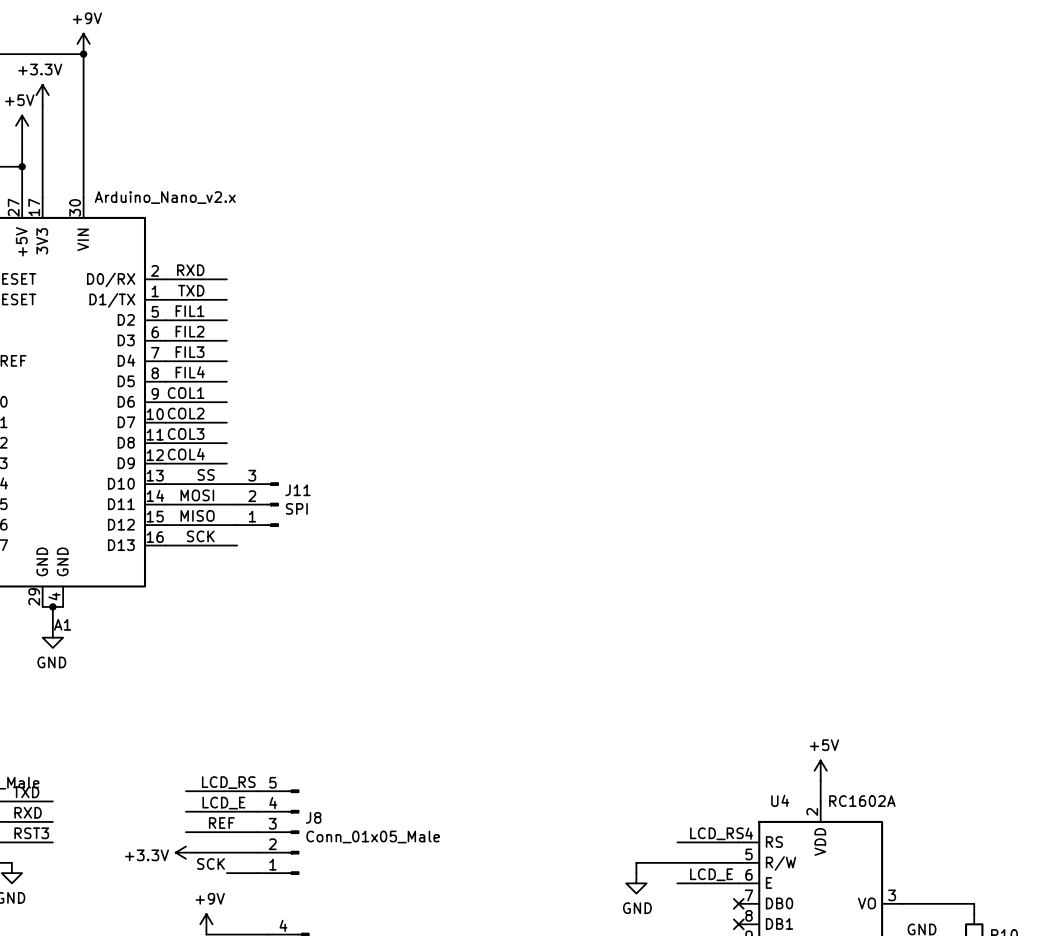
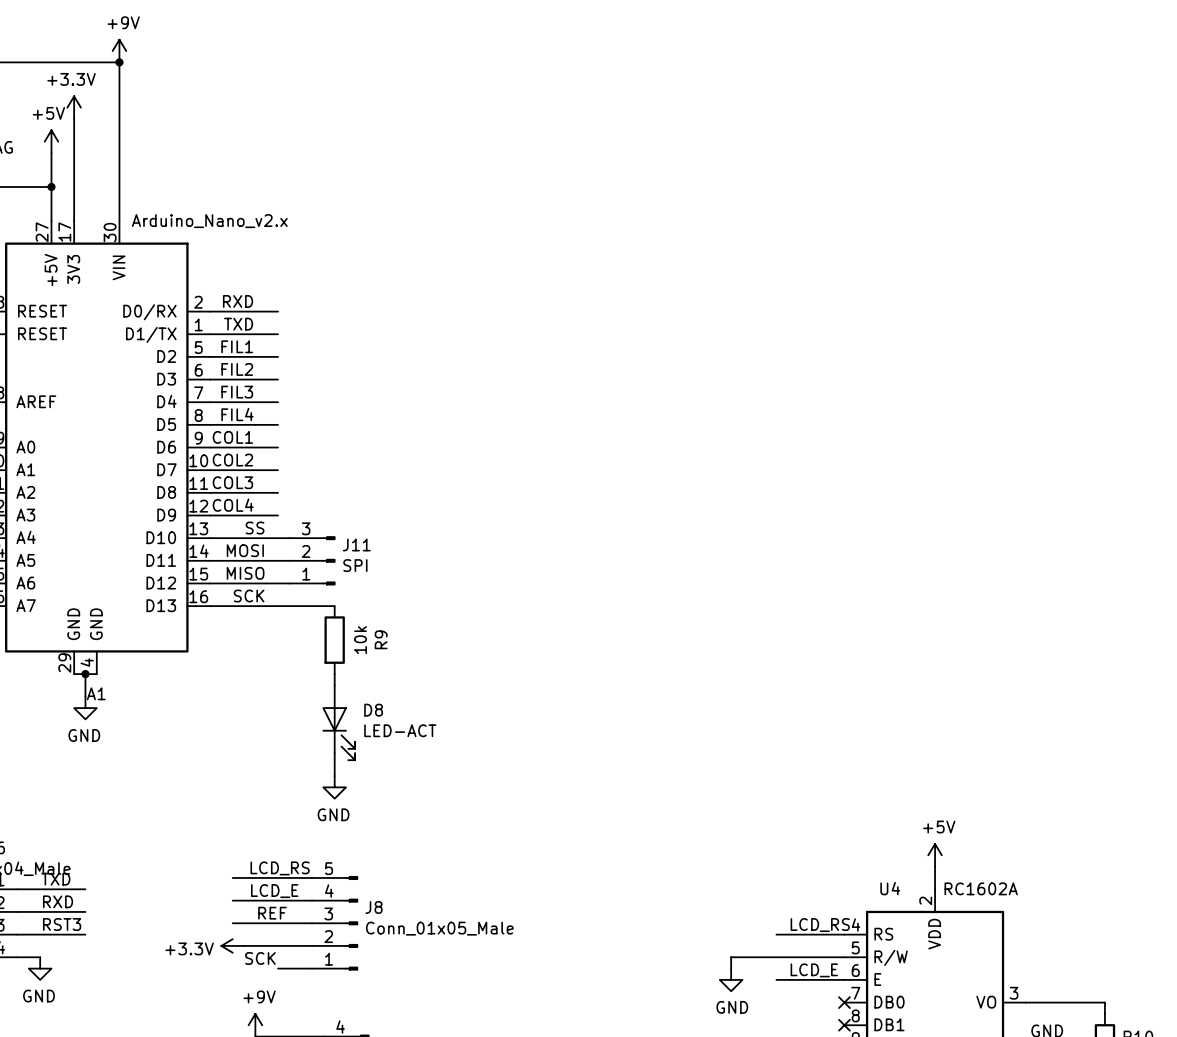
wire: none -> (289, 606) (334, 606)
R9: none -> 10k (334, 640)
wire: none -> (334, 674) (334, 685)
D8: none -> LED-ACT (338, 722)
wire: none -> (334, 753) (334, 776)
power symbol: none -> GND (334, 787)

